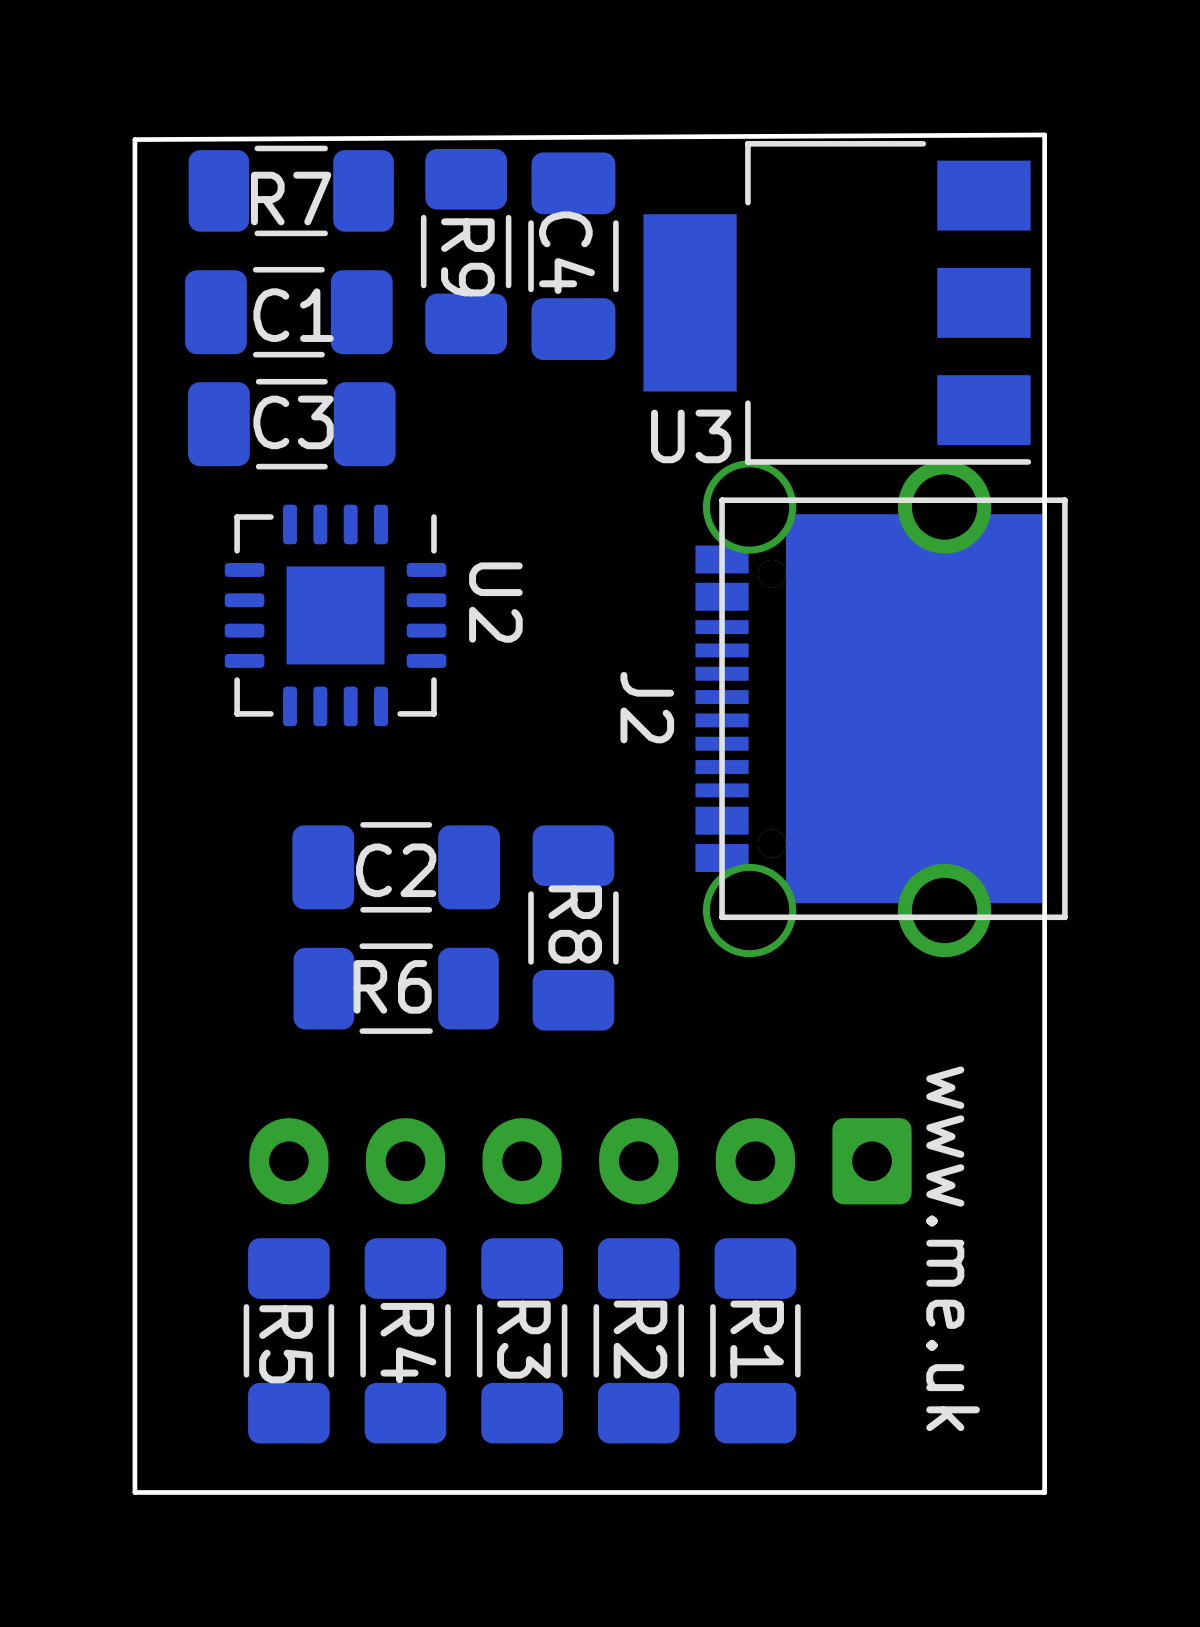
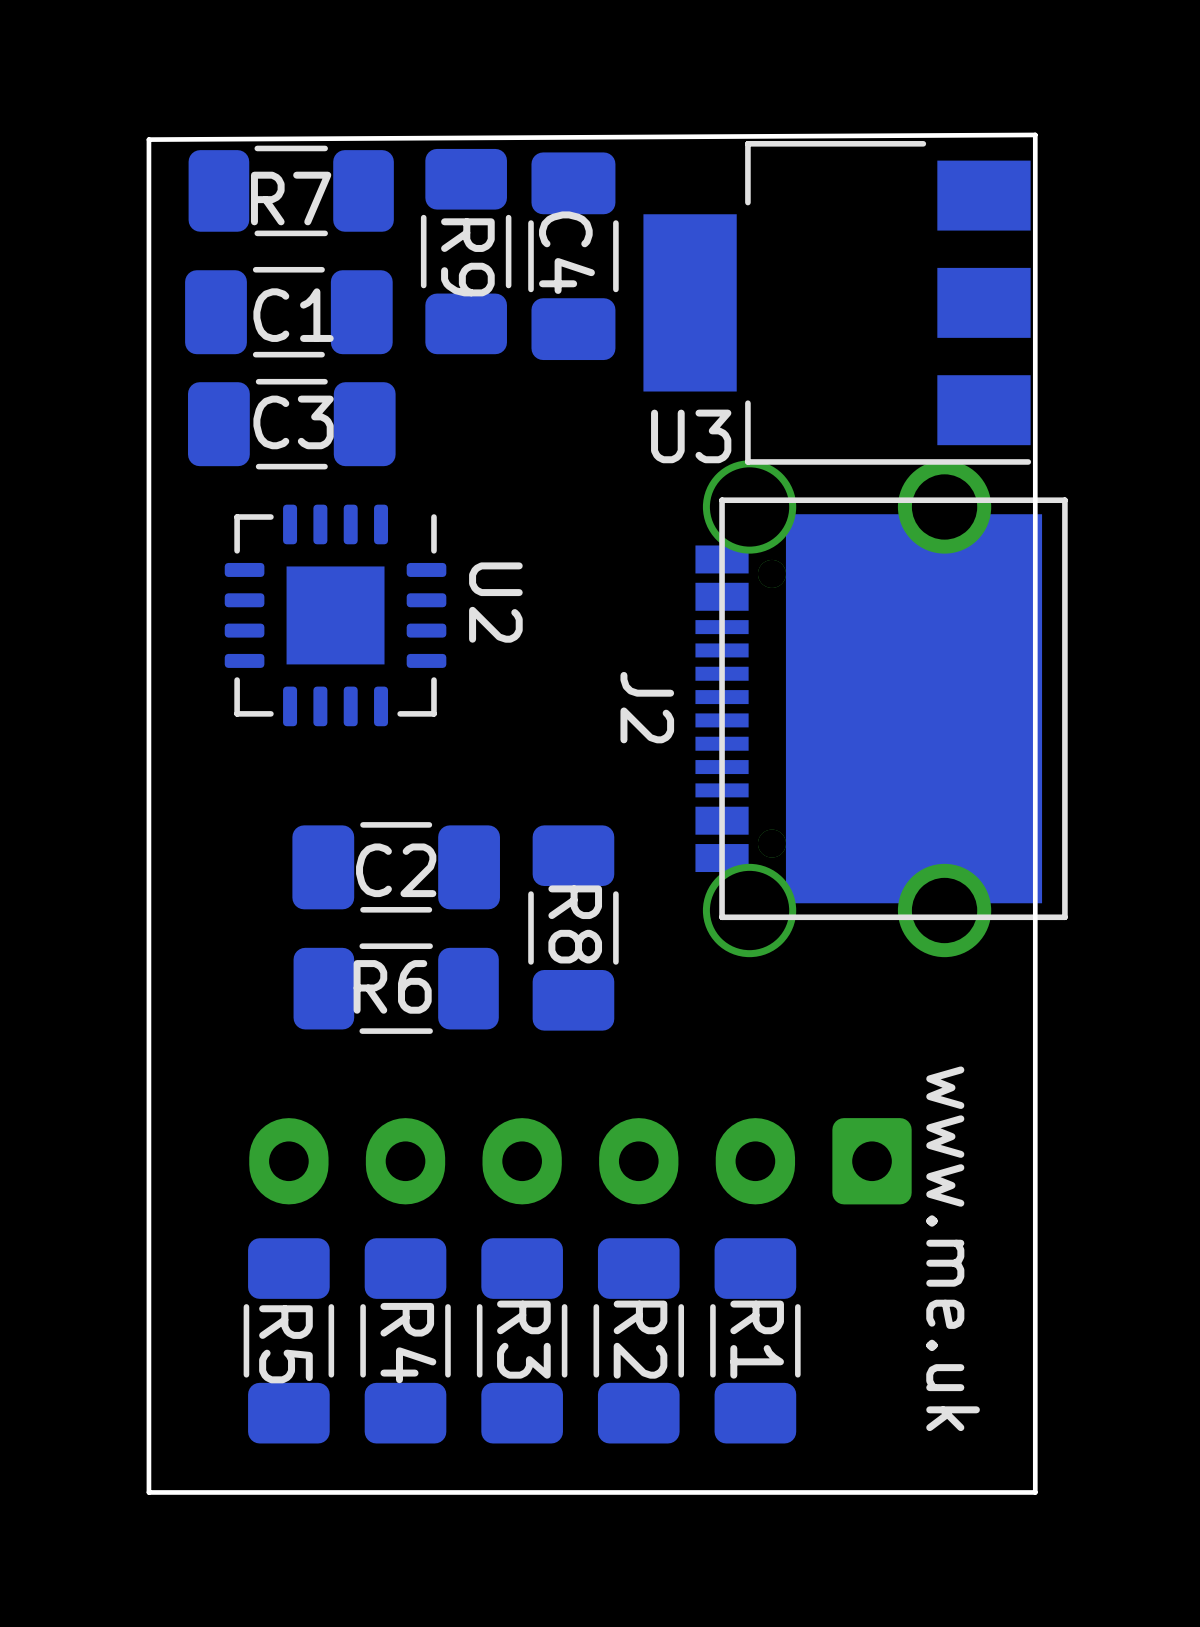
board edge: (1035, 1492) (1044, 1492) (1044, 134) (134, 139) (134, 1492) (148, 1492) -> (1035, 1492) (1035, 134) (148, 139) (148, 1492)

